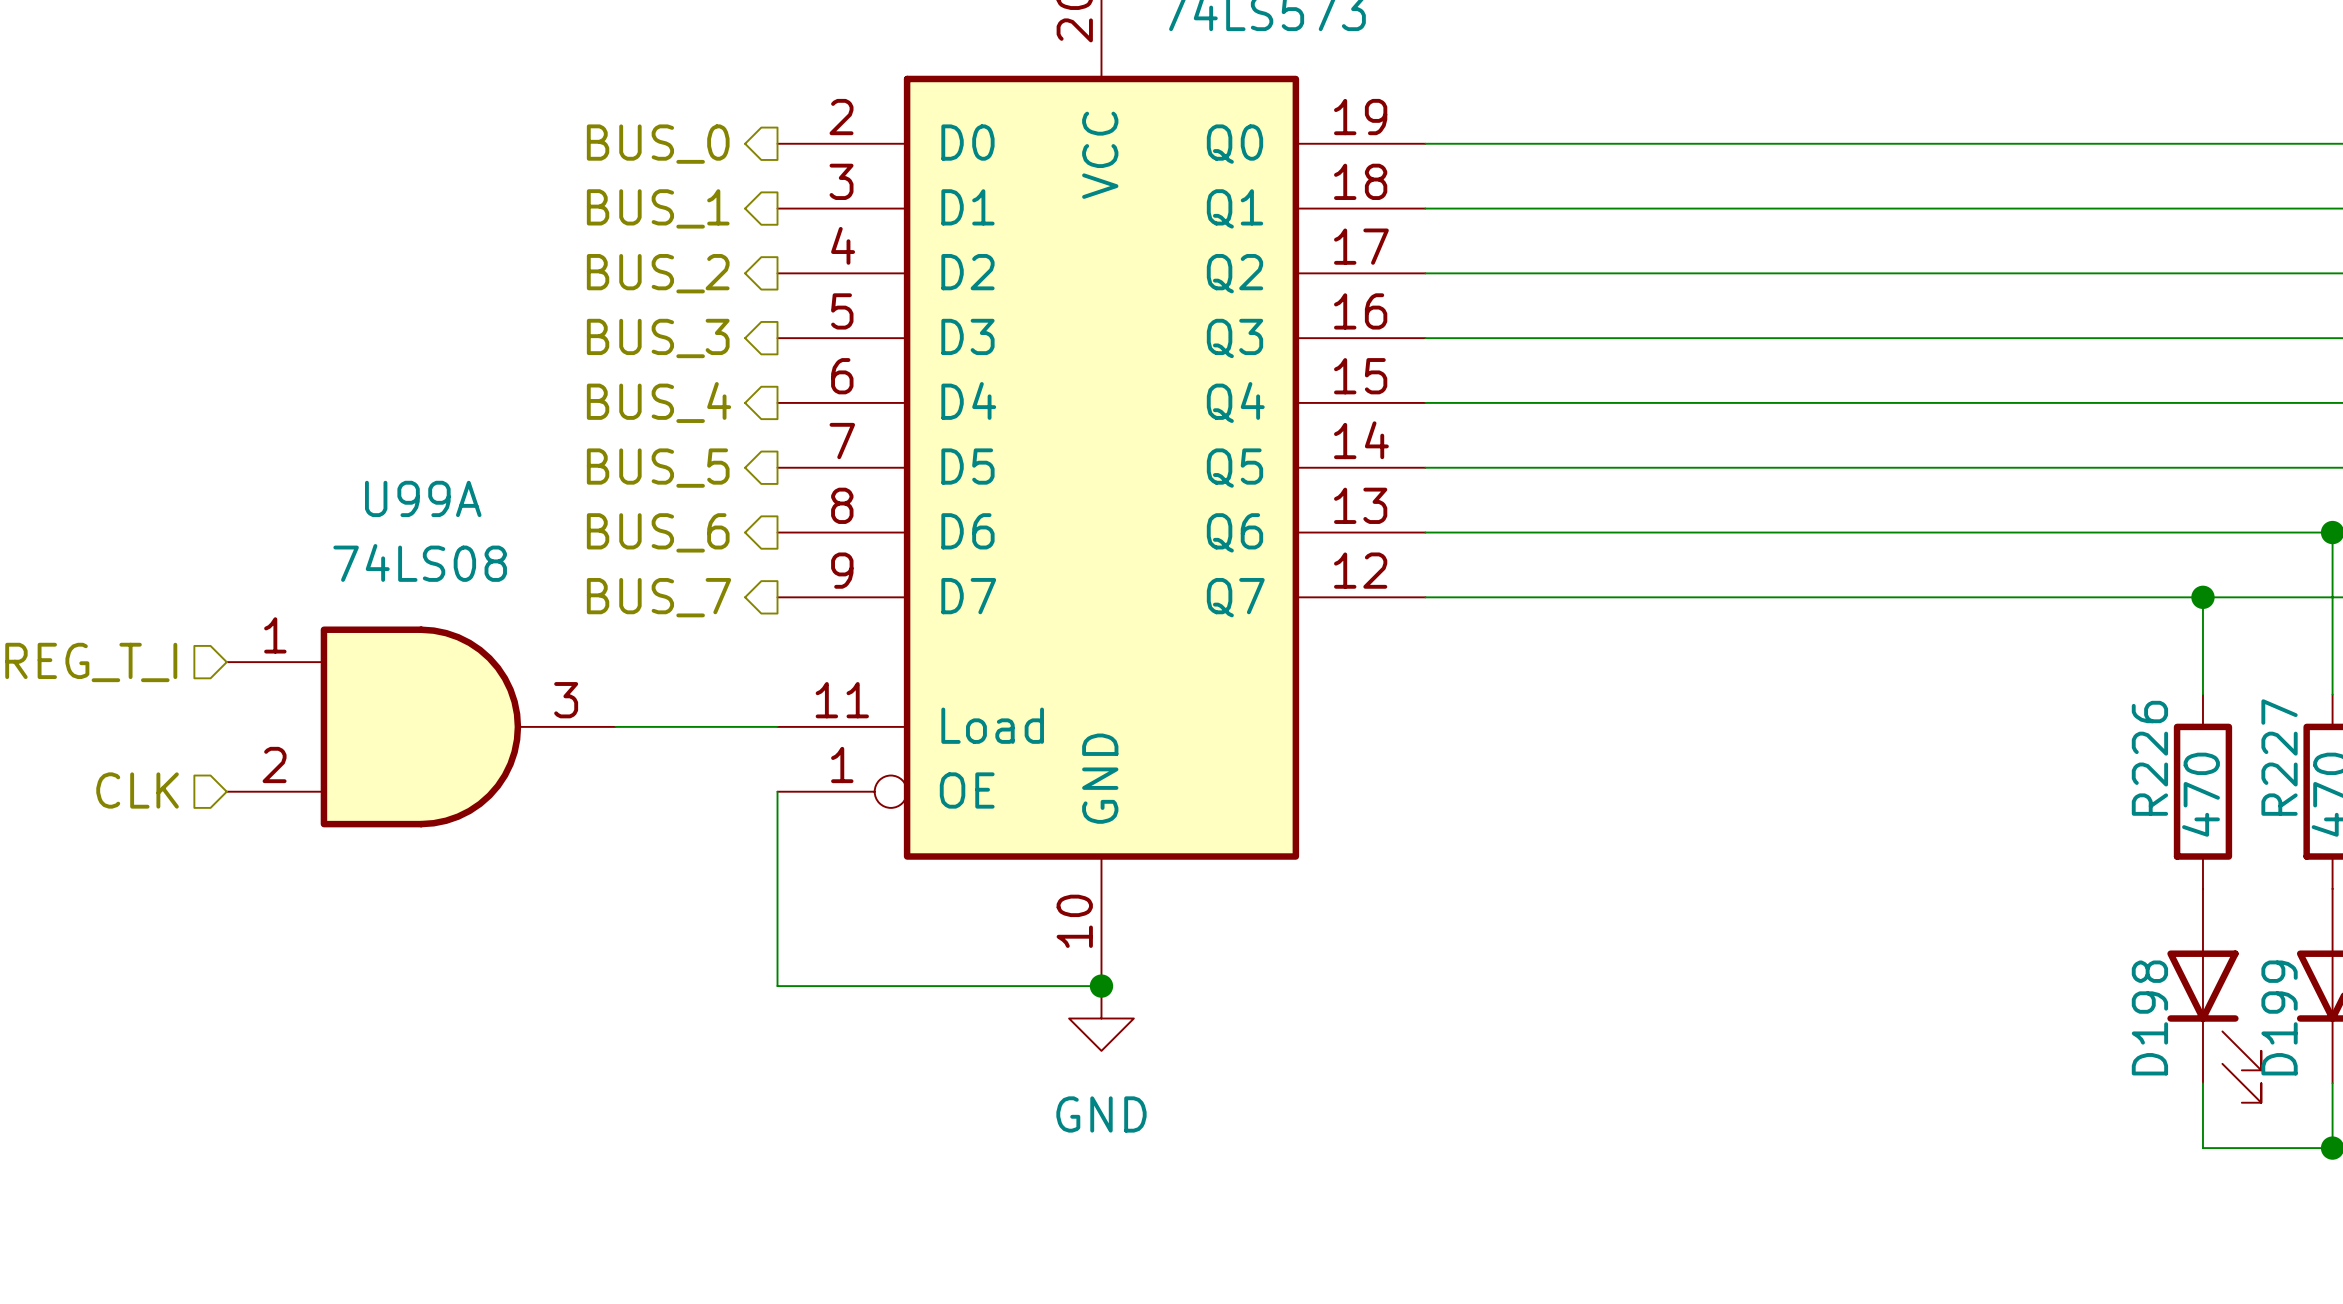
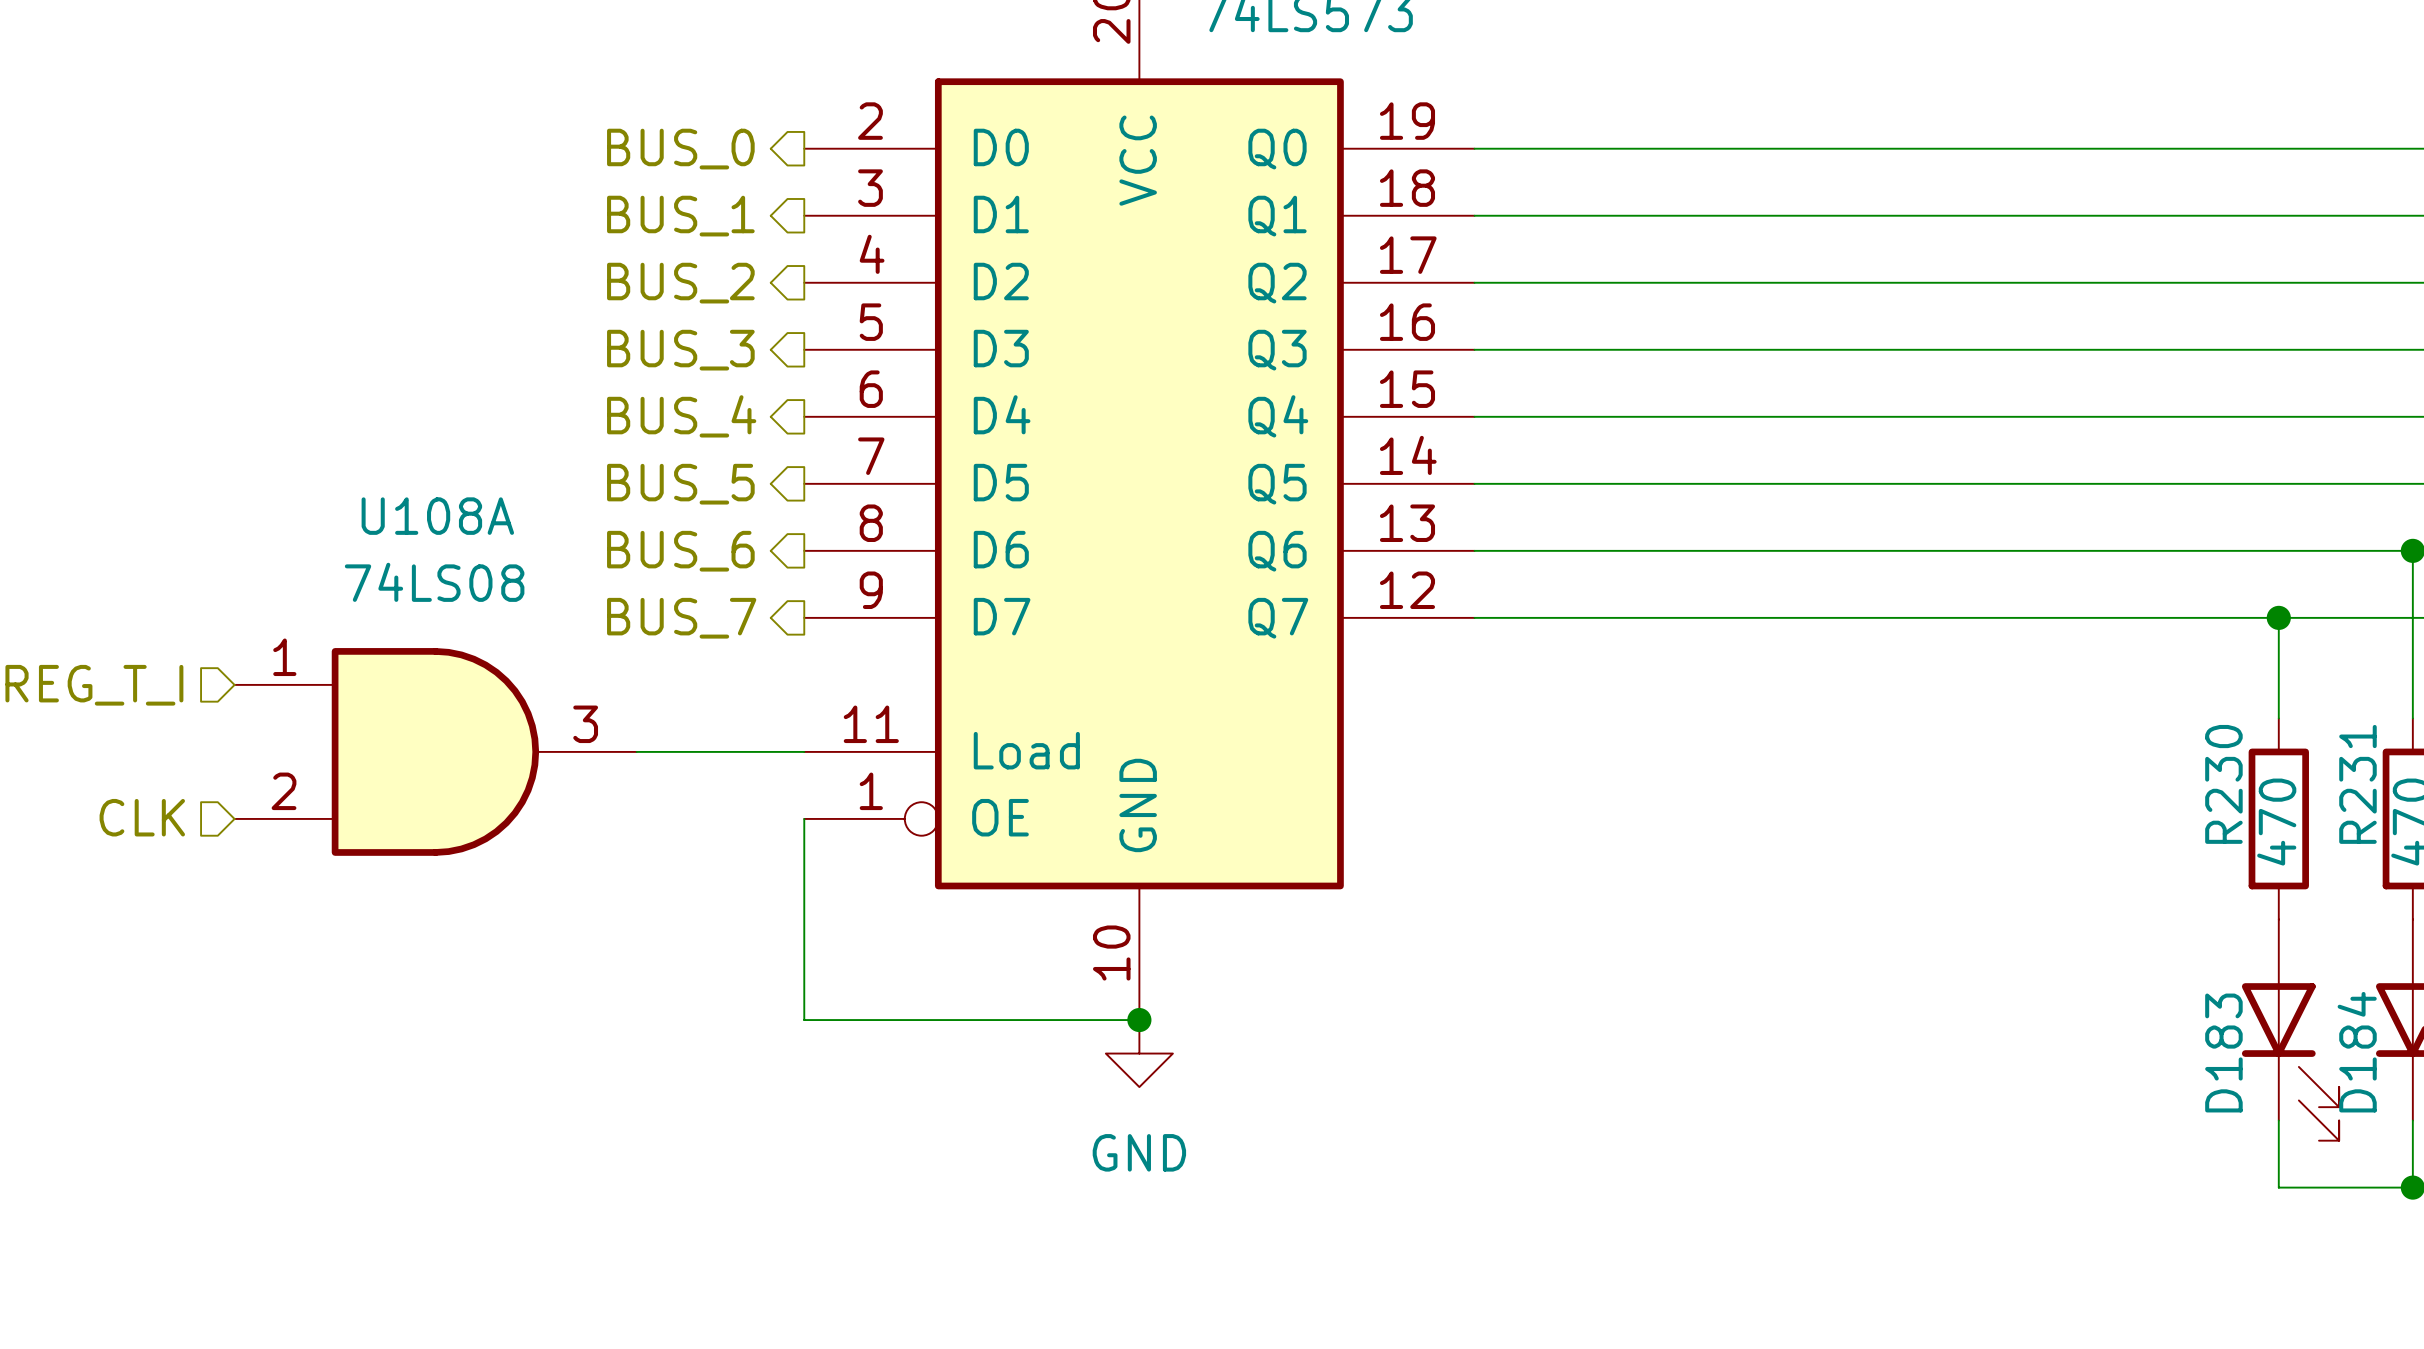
U99A name: U99A (423, 498) -> U108A (437, 516)
R227 name: R227 (2279, 757) -> R231 (2357, 784)
R226 name: R226 (2149, 758) -> R230 (2223, 784)
D198 name: D198 (2149, 1017) -> D183 (2223, 1053)
D199 name: D199 (2279, 1017) -> D184 (2357, 1052)

